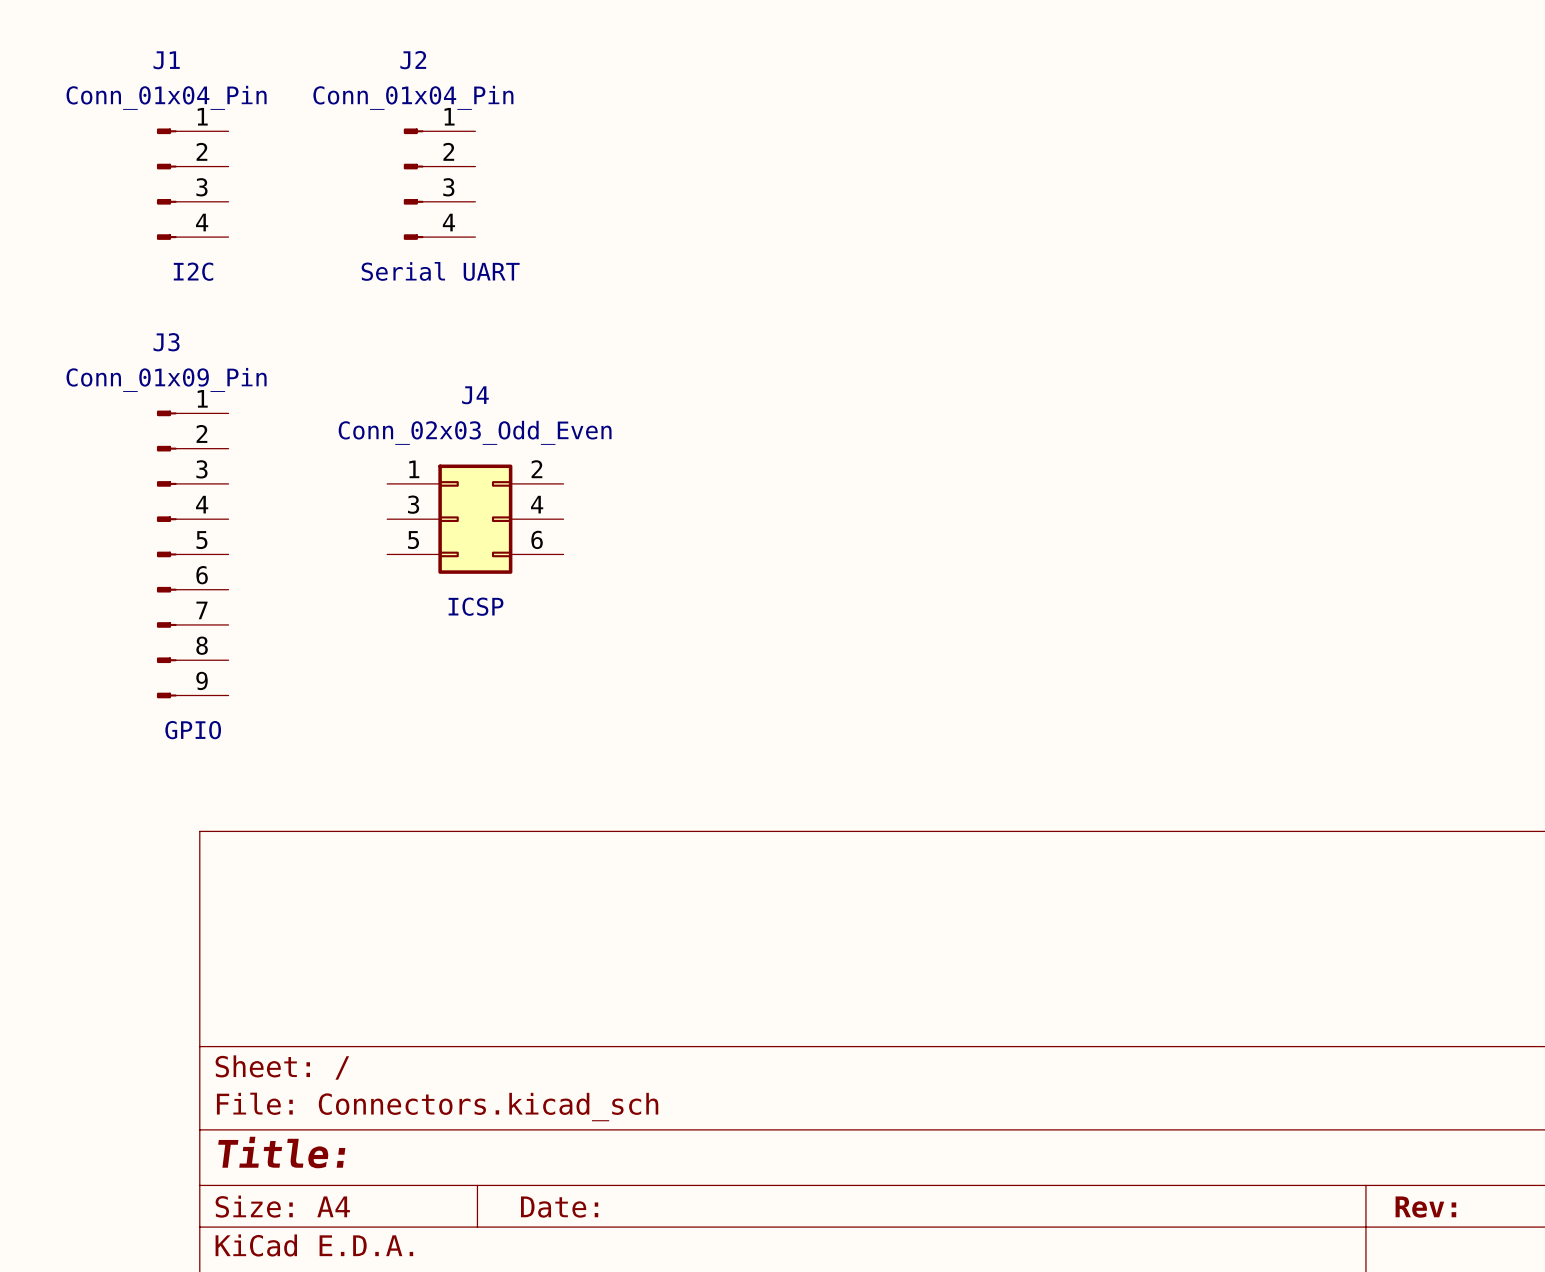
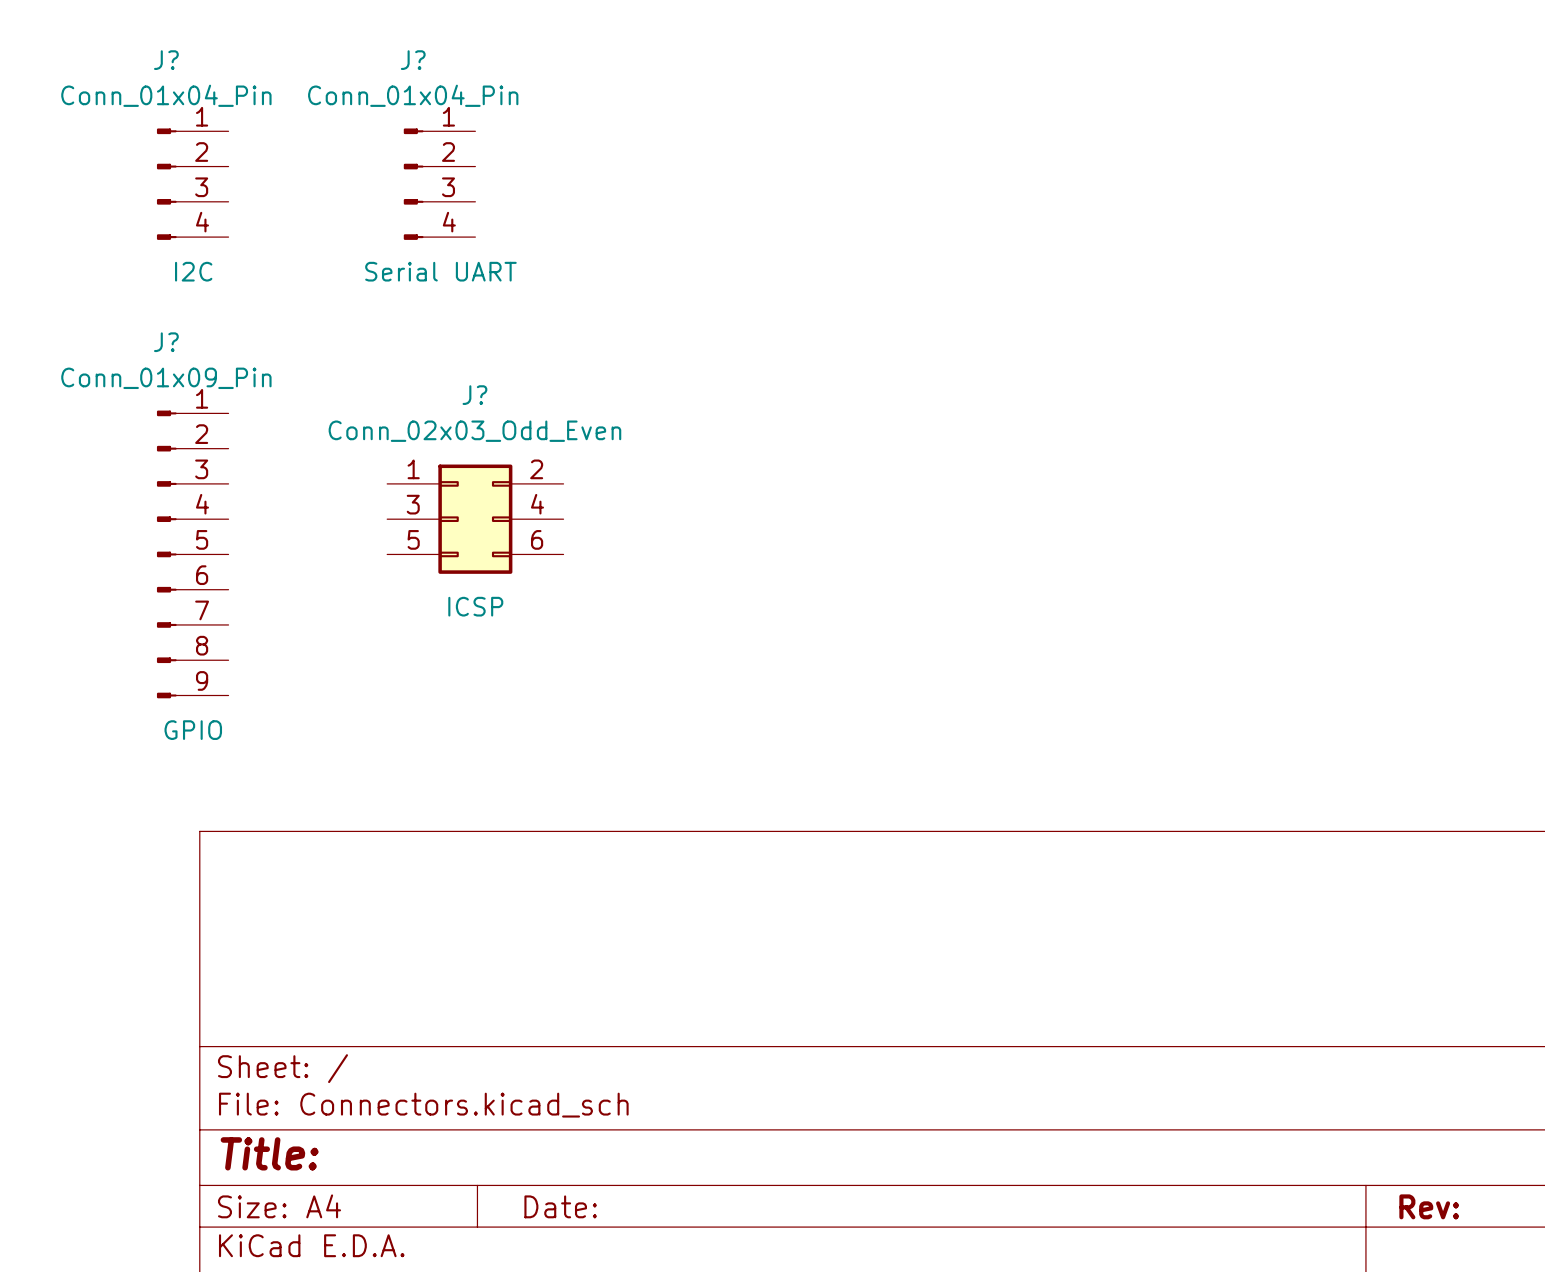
J1 name: J1 (166, 60) -> J? (166, 60)
J2 name: J2 (413, 60) -> J? (413, 60)
J3 name: J3 (166, 342) -> J? (166, 342)
J4 name: J4 (475, 395) -> J? (474, 395)

